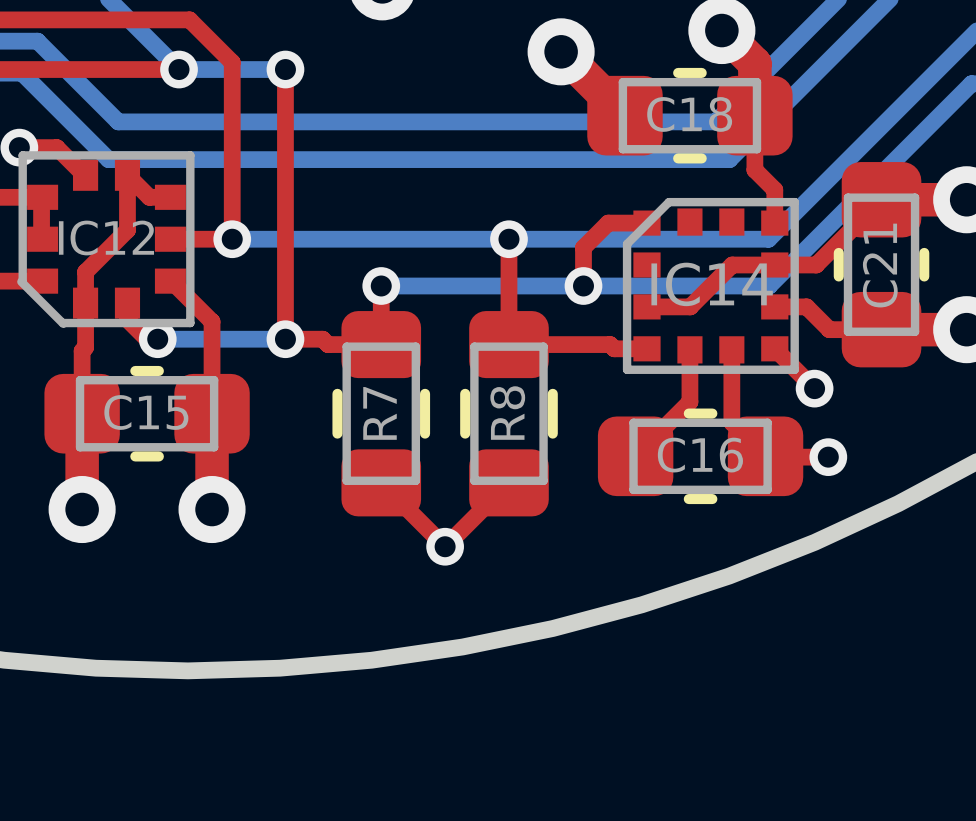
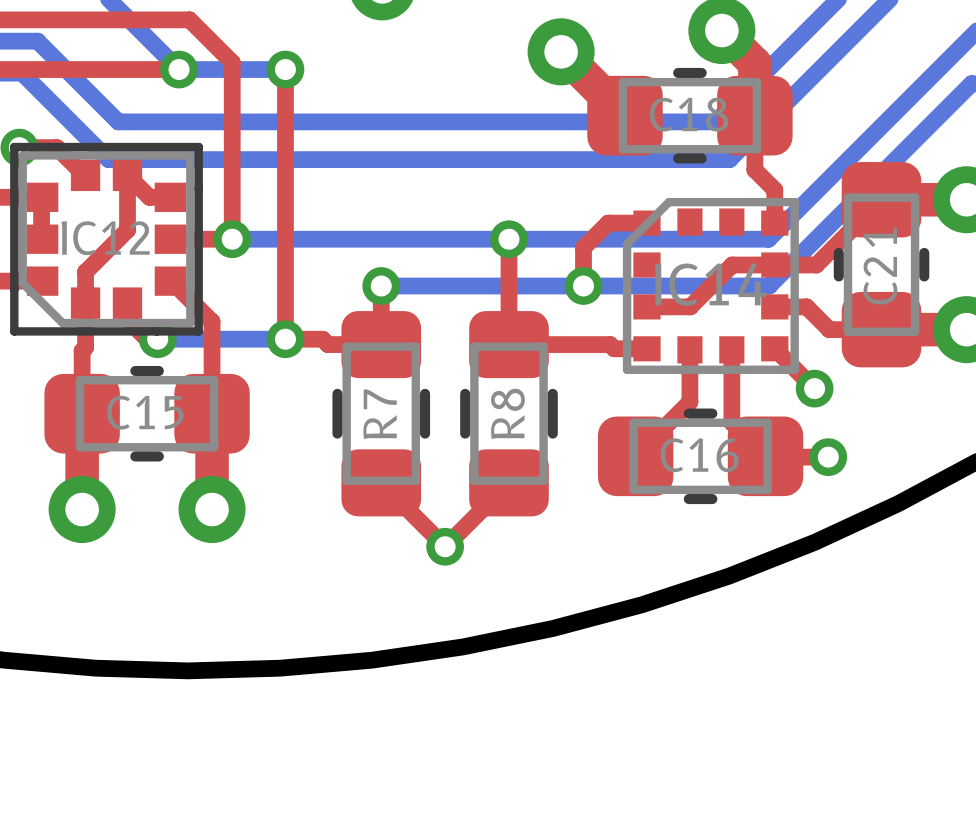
IC12 footprint: [17, 151, 195, 328] -> [10, 142, 203, 336]

